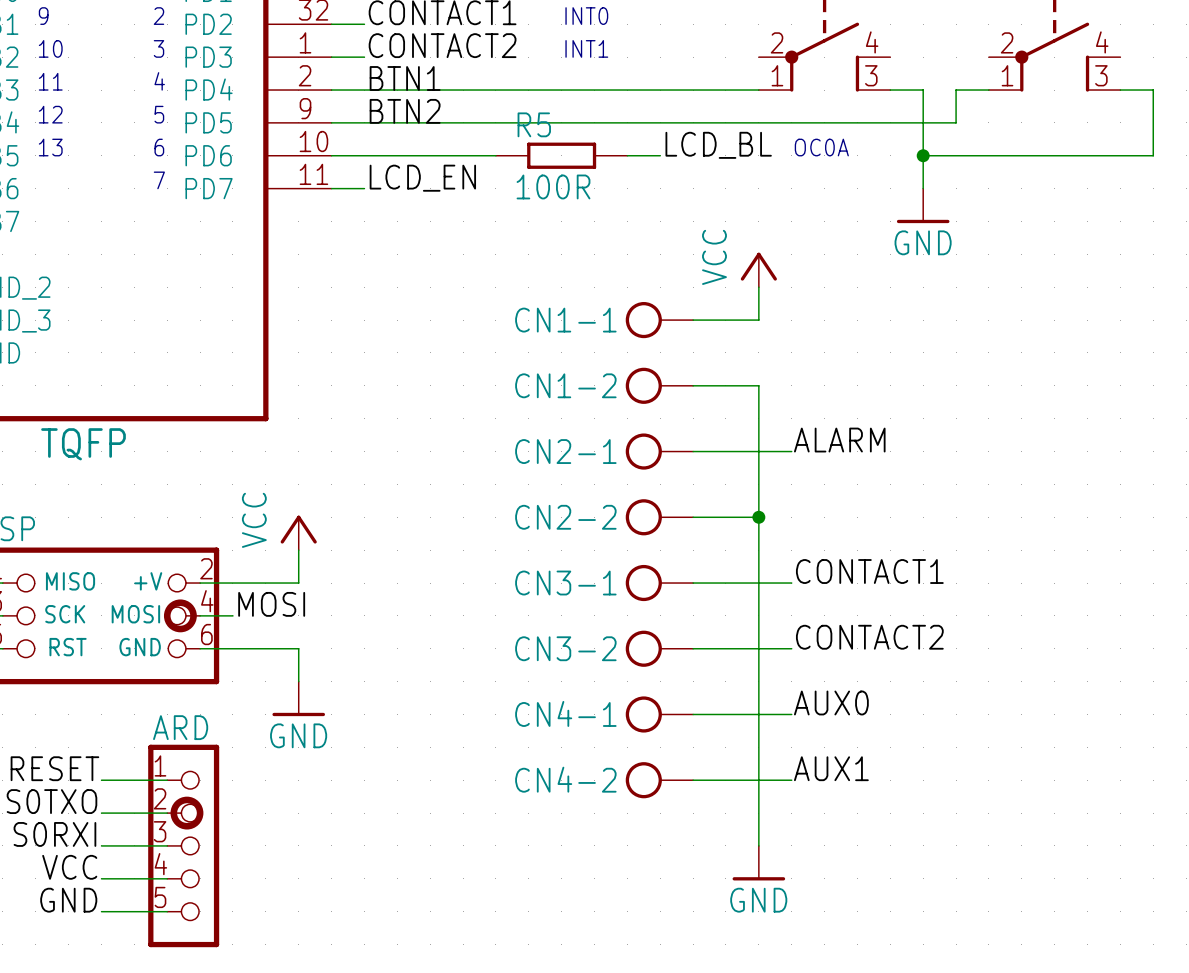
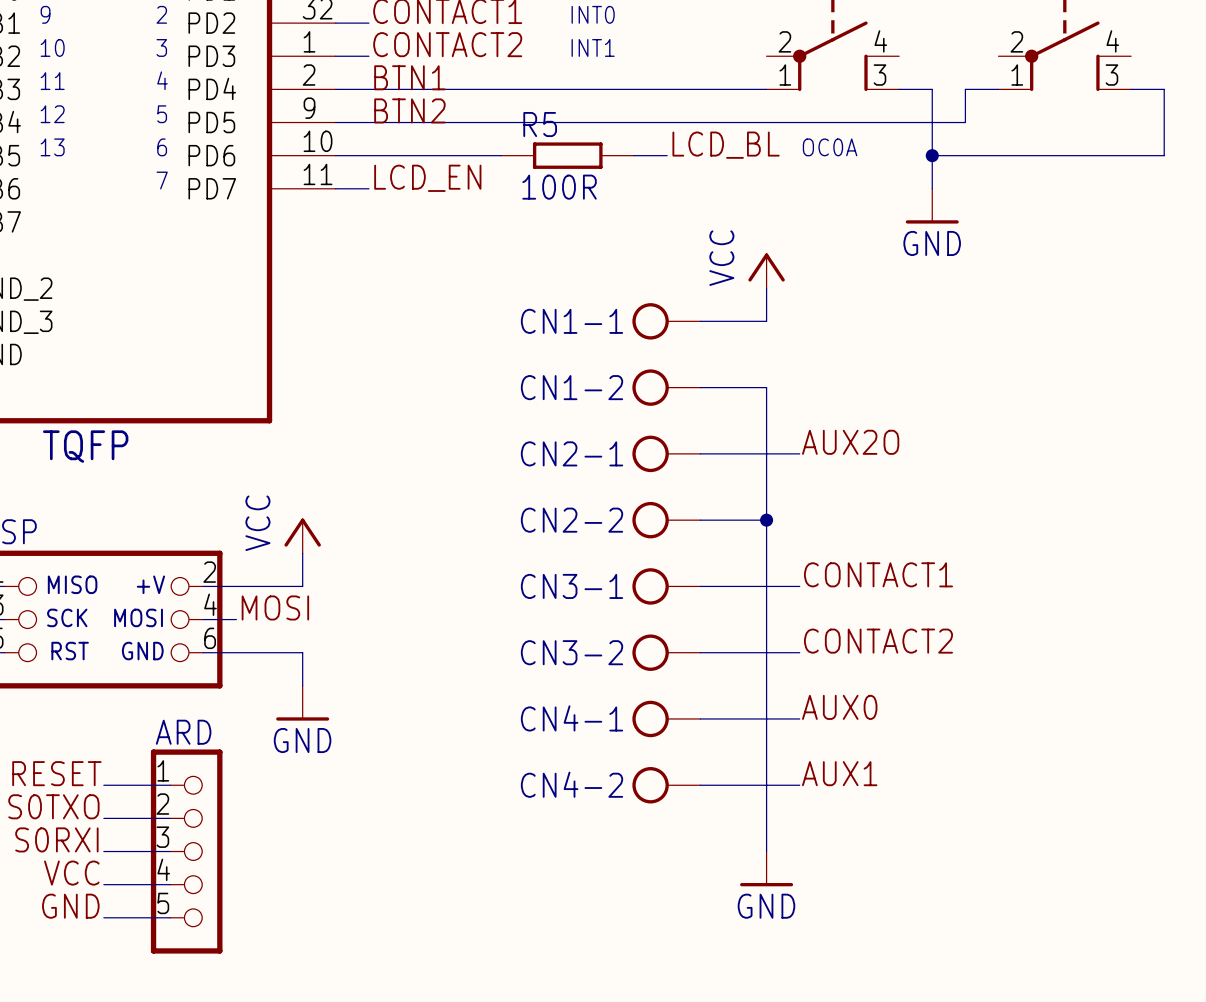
label: ALARM (839, 440) -> AUX2O (850, 442)
drawing: [163, 599, 197, 633] -> none
drawing: [170, 796, 204, 830] -> none

